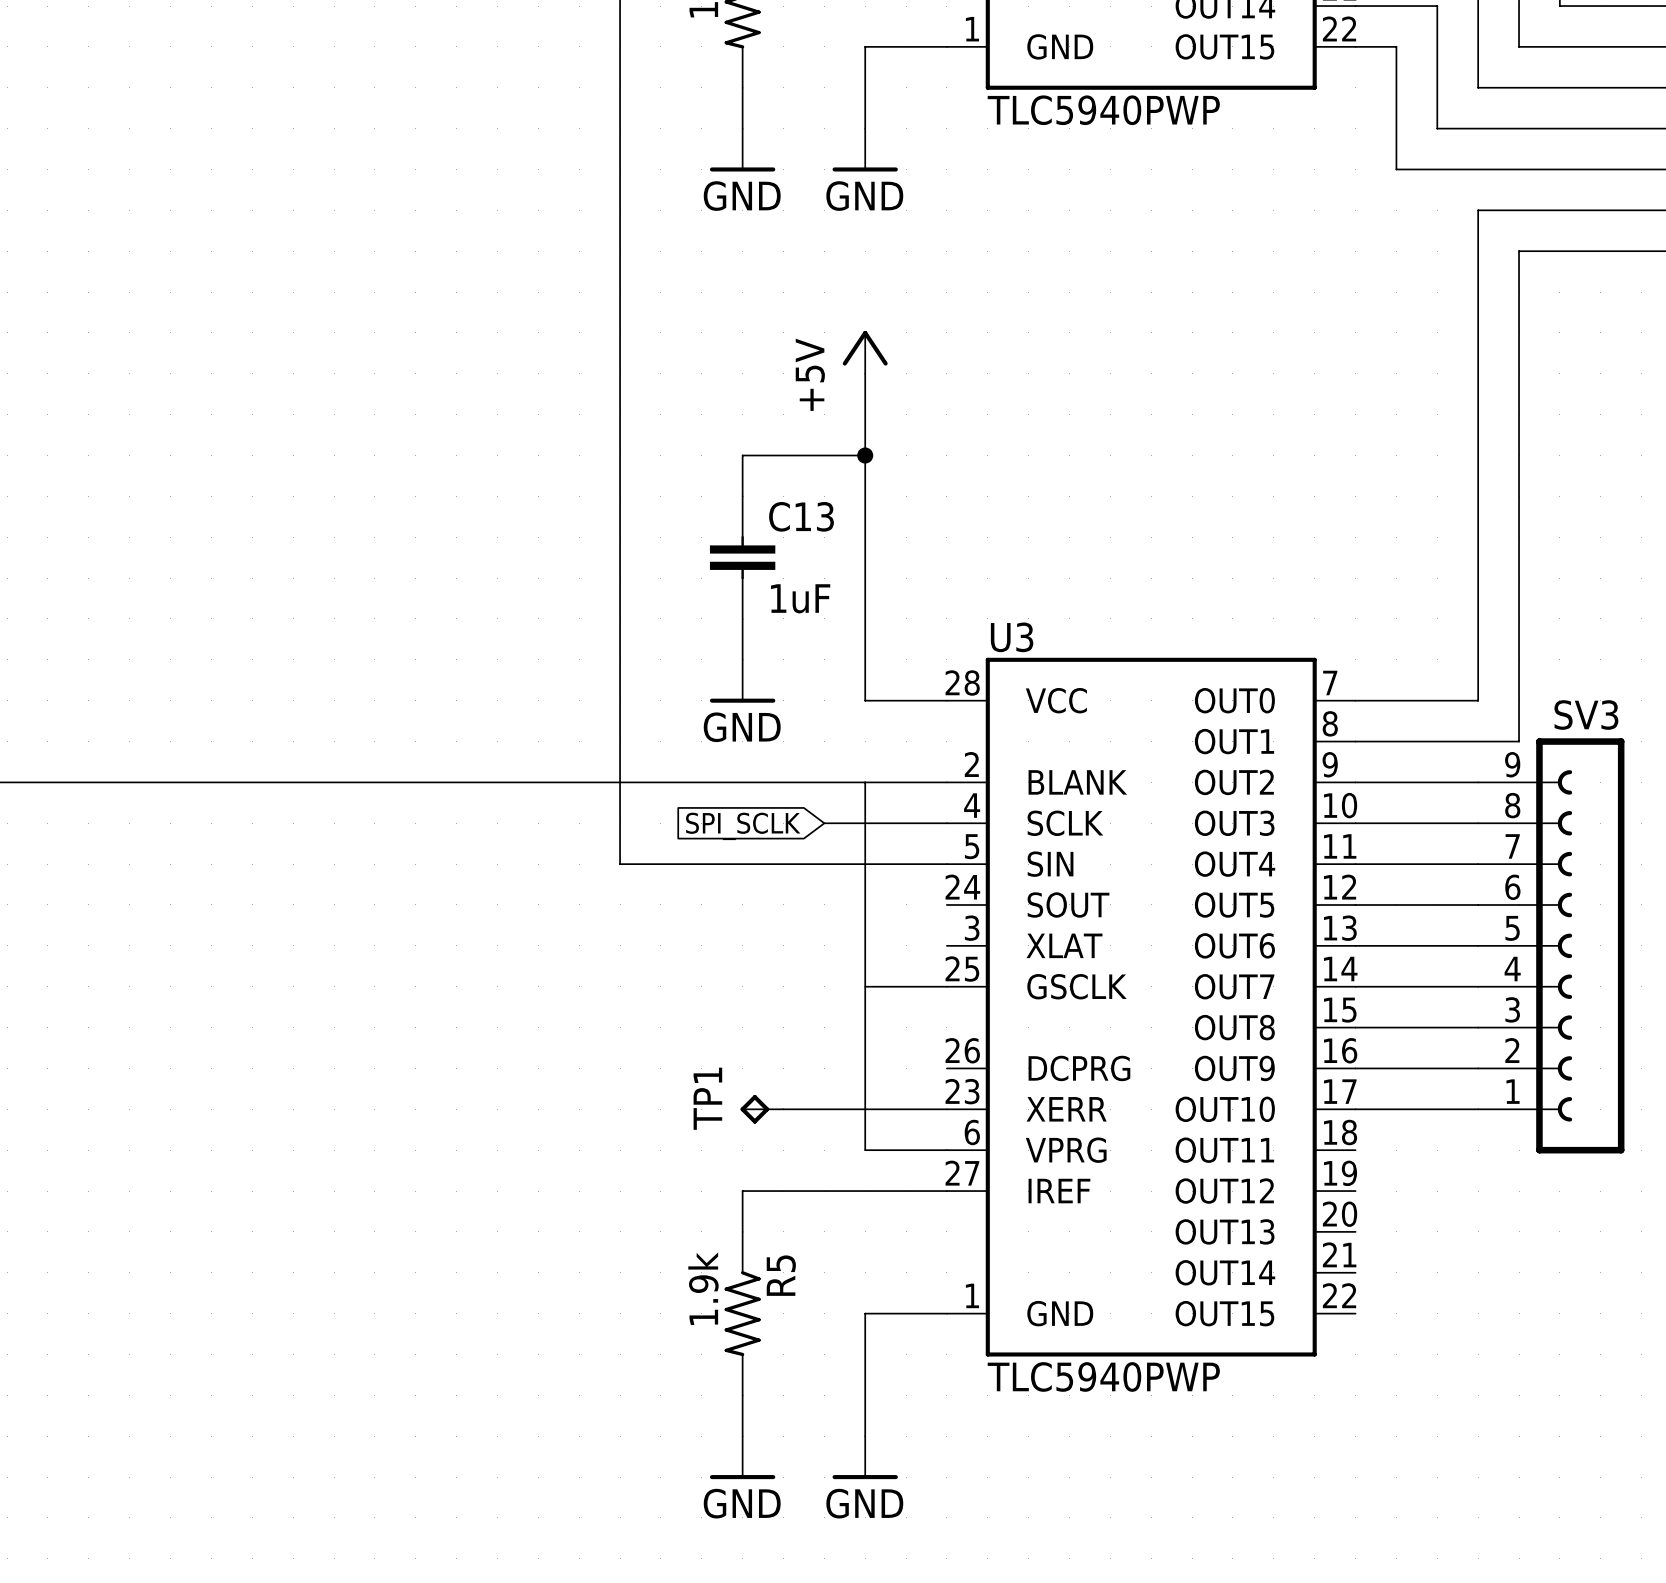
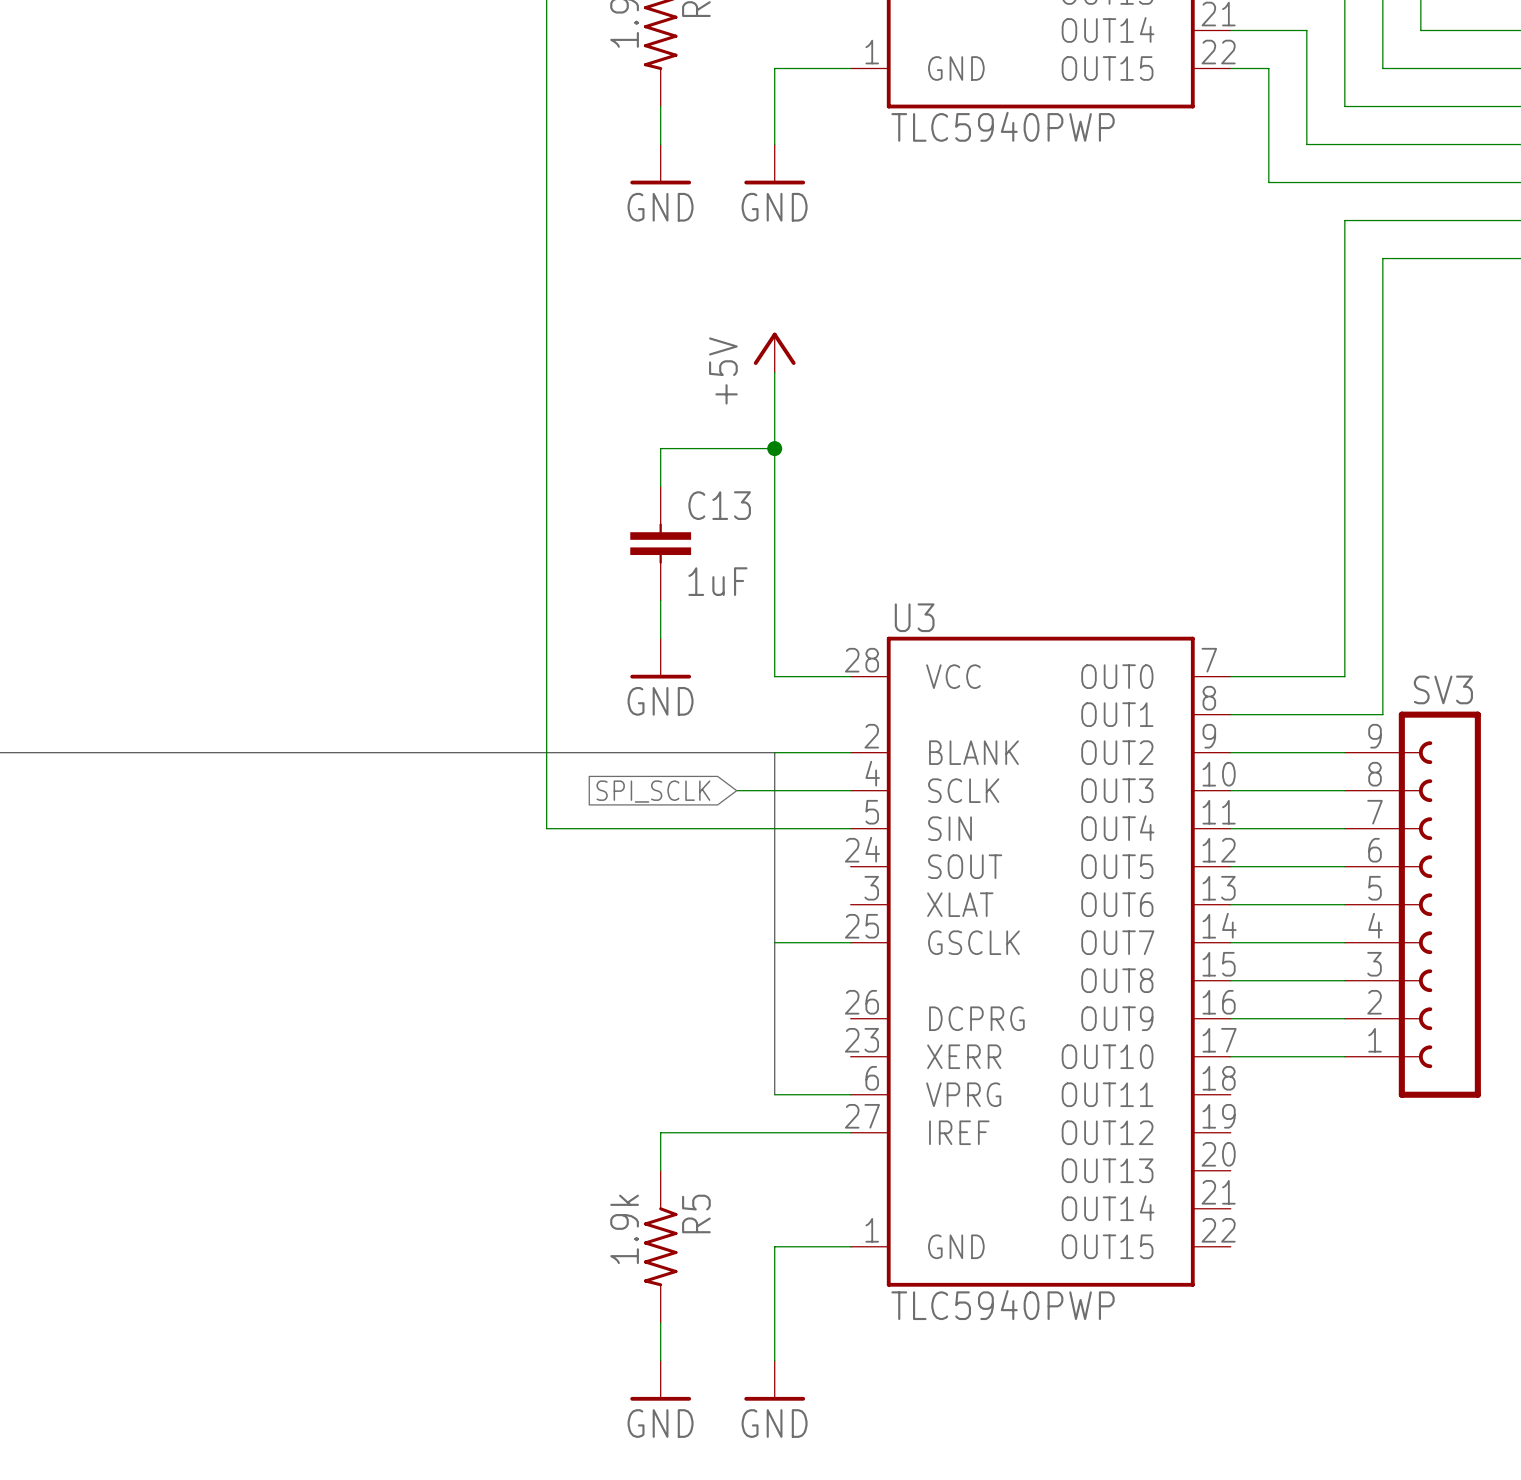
TP1: (762, 1109) -> none
wire: (783, 1109) (946, 1109) -> none

